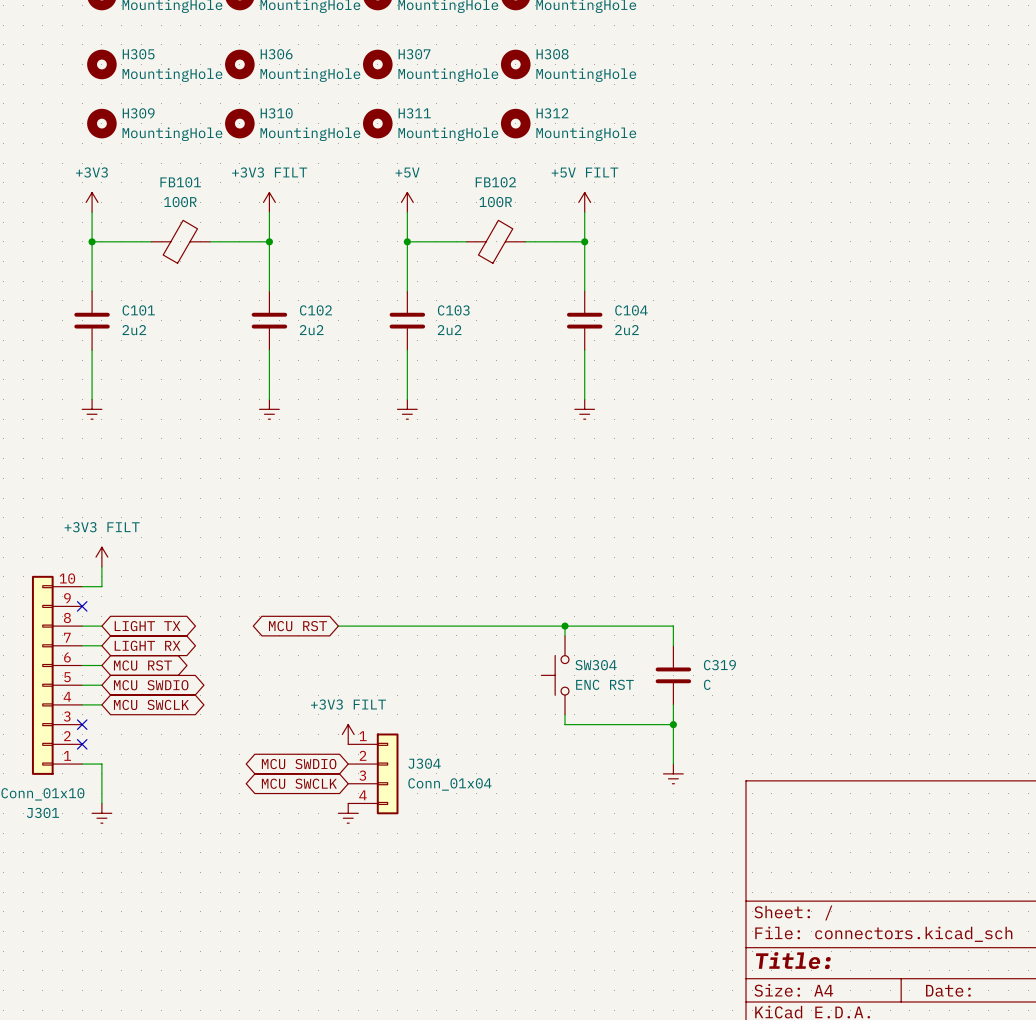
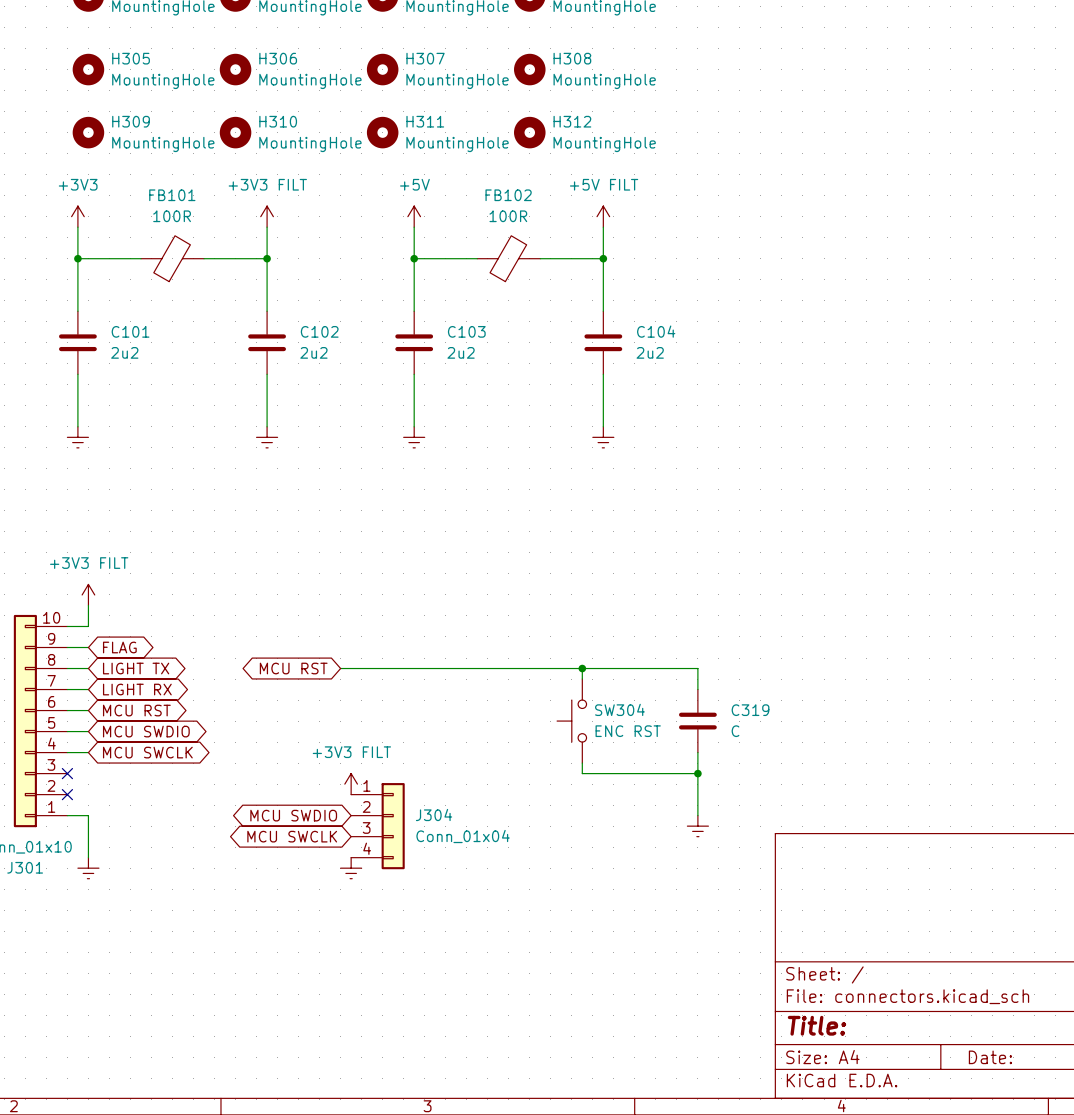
wire: none -> (67, 647) (88, 647)
no-connect mark: (82, 606) -> none
global label: none -> FLAG (119, 647)

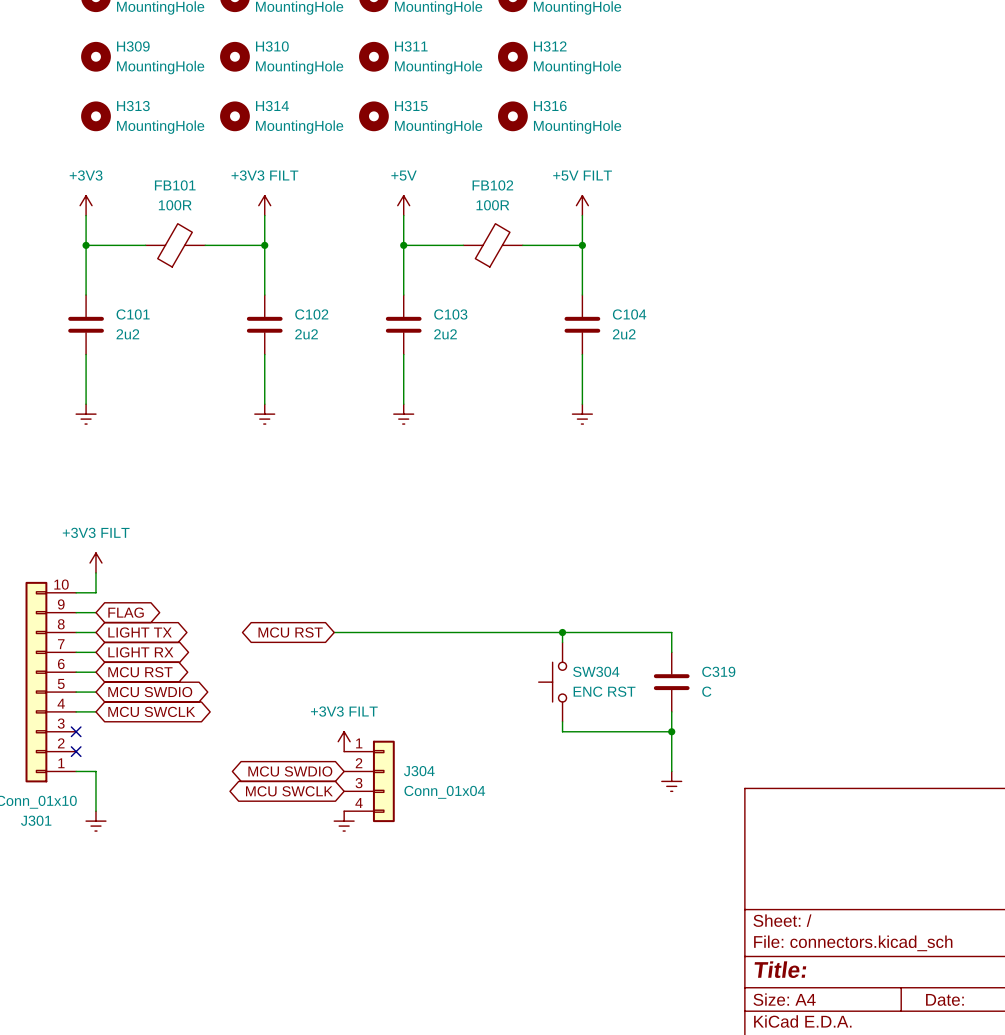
H305: MountingHole (88, 69) -> none
H306: MountingHole (235, 69) -> none
H307: MountingHole (382, 69) -> none
H308: MountingHole (529, 69) -> none
H313: none -> MountingHole (95, 116)
H314: none -> MountingHole (234, 116)
H315: none -> MountingHole (373, 116)
H316: none -> MountingHole (512, 116)
H309 position: (88, 132) -> (95, 56)
H310 position: (235, 132) -> (234, 56)
H311 position: (382, 132) -> (373, 56)
H312 position: (529, 132) -> (512, 56)

